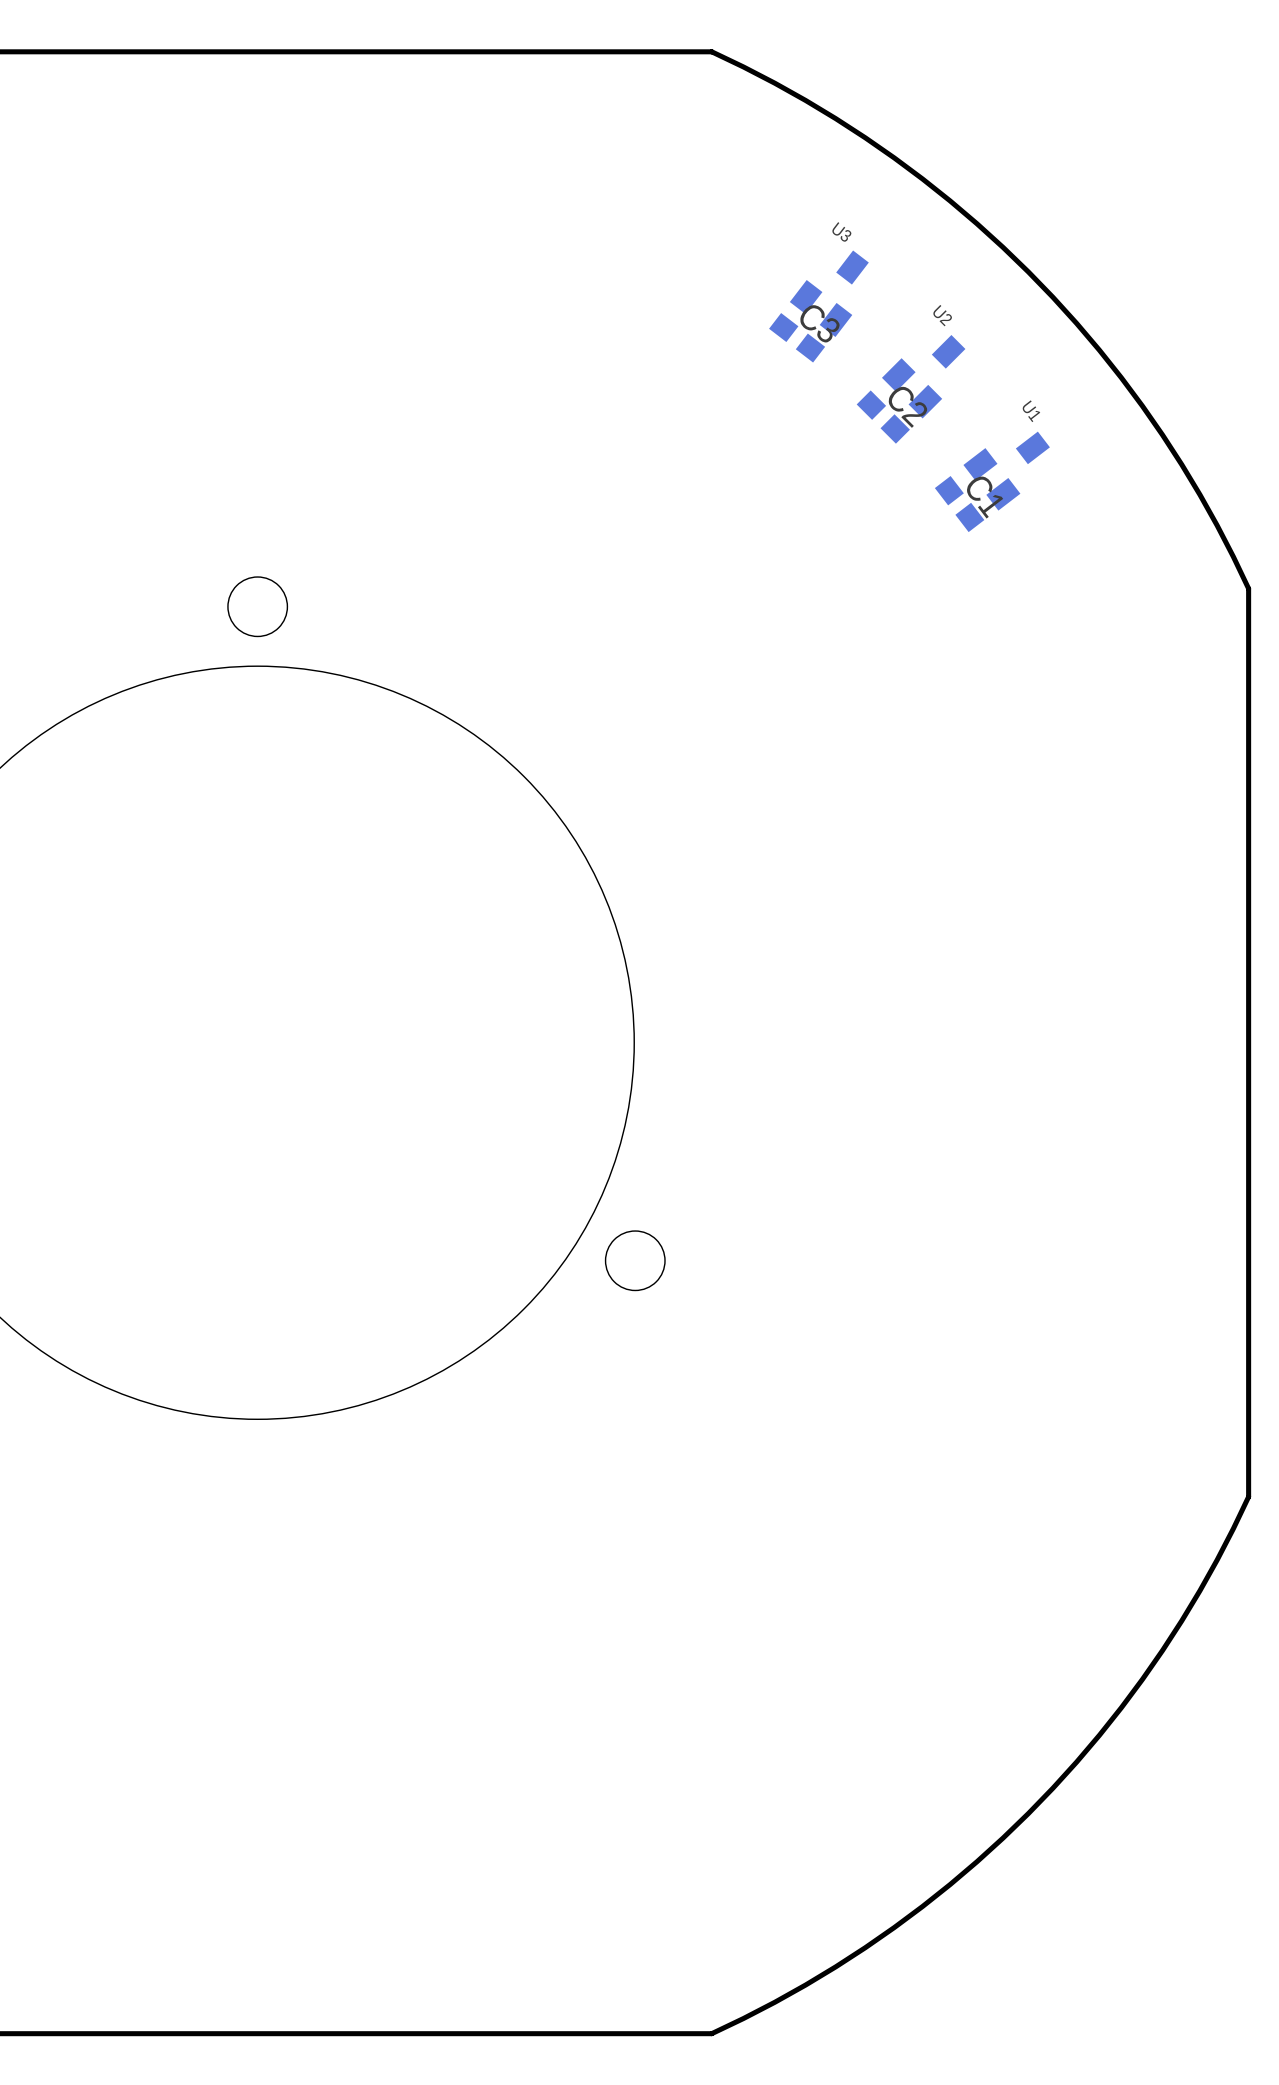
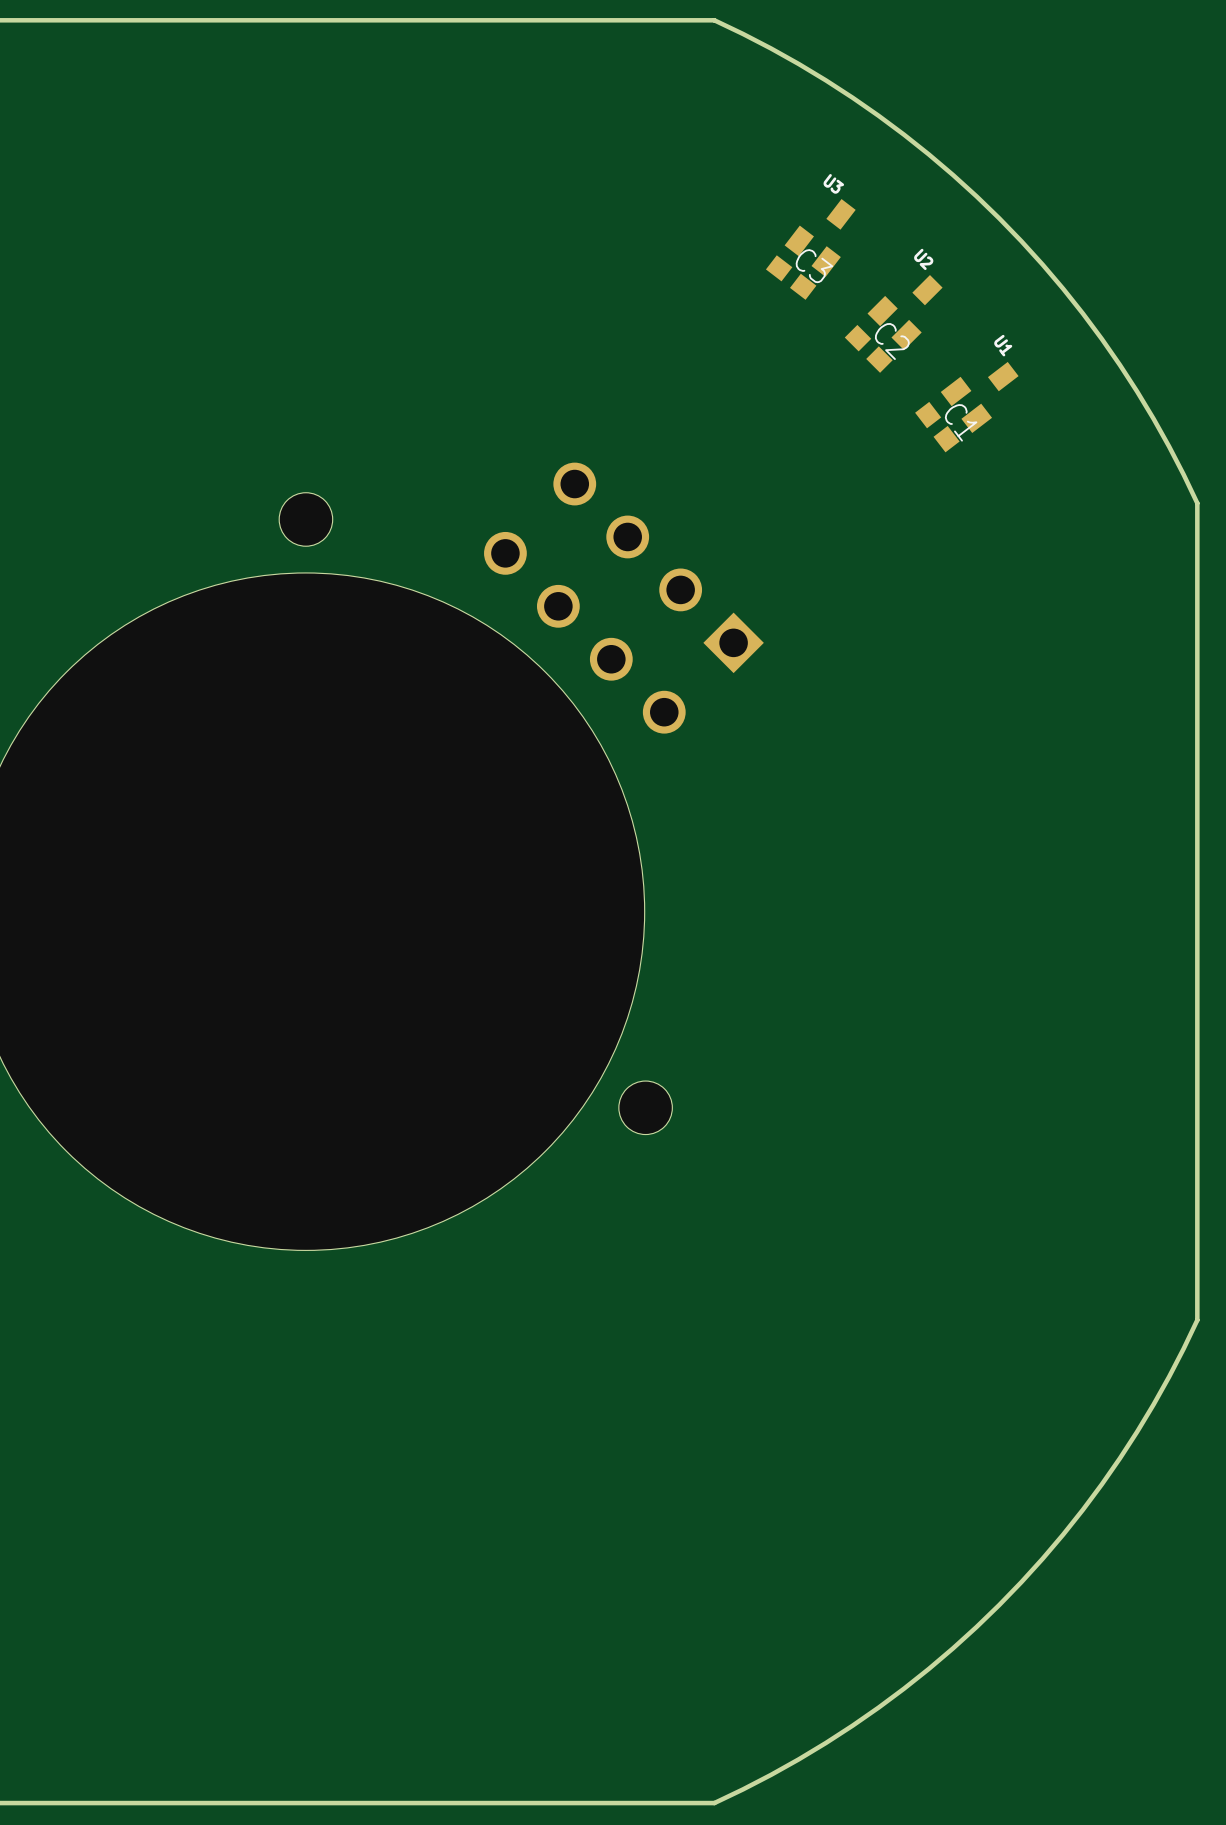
part: none -> (623, 598)

